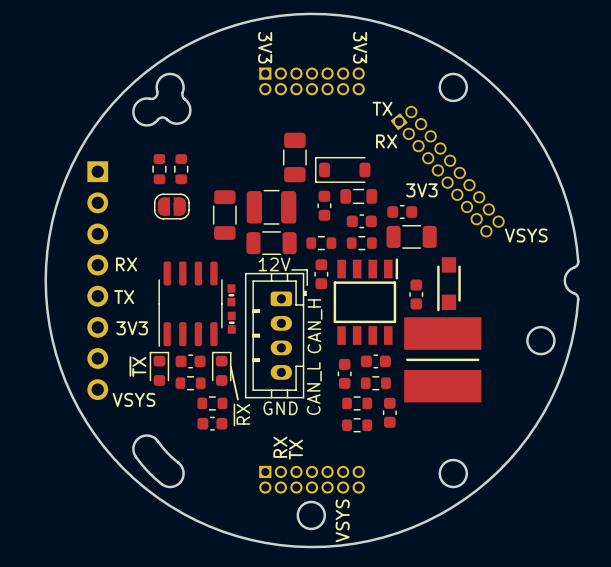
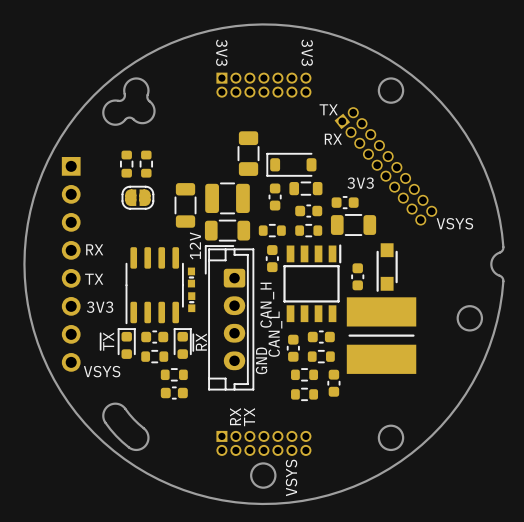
text rotation: 0° (274, 264) -> 90° counterclockwise (195, 245)
part footprint: [244, 269, 308, 399] -> [205, 245, 255, 391]
text: none -> CAN_L (275, 334)
line: (230, 366) (237, 399) -> none
text: CAN_L (314, 388) -> GND (261, 360)
text: GND (280, 408) -> none
text position: ~{RX} (241, 414) -> ~{RX} (200, 342)

